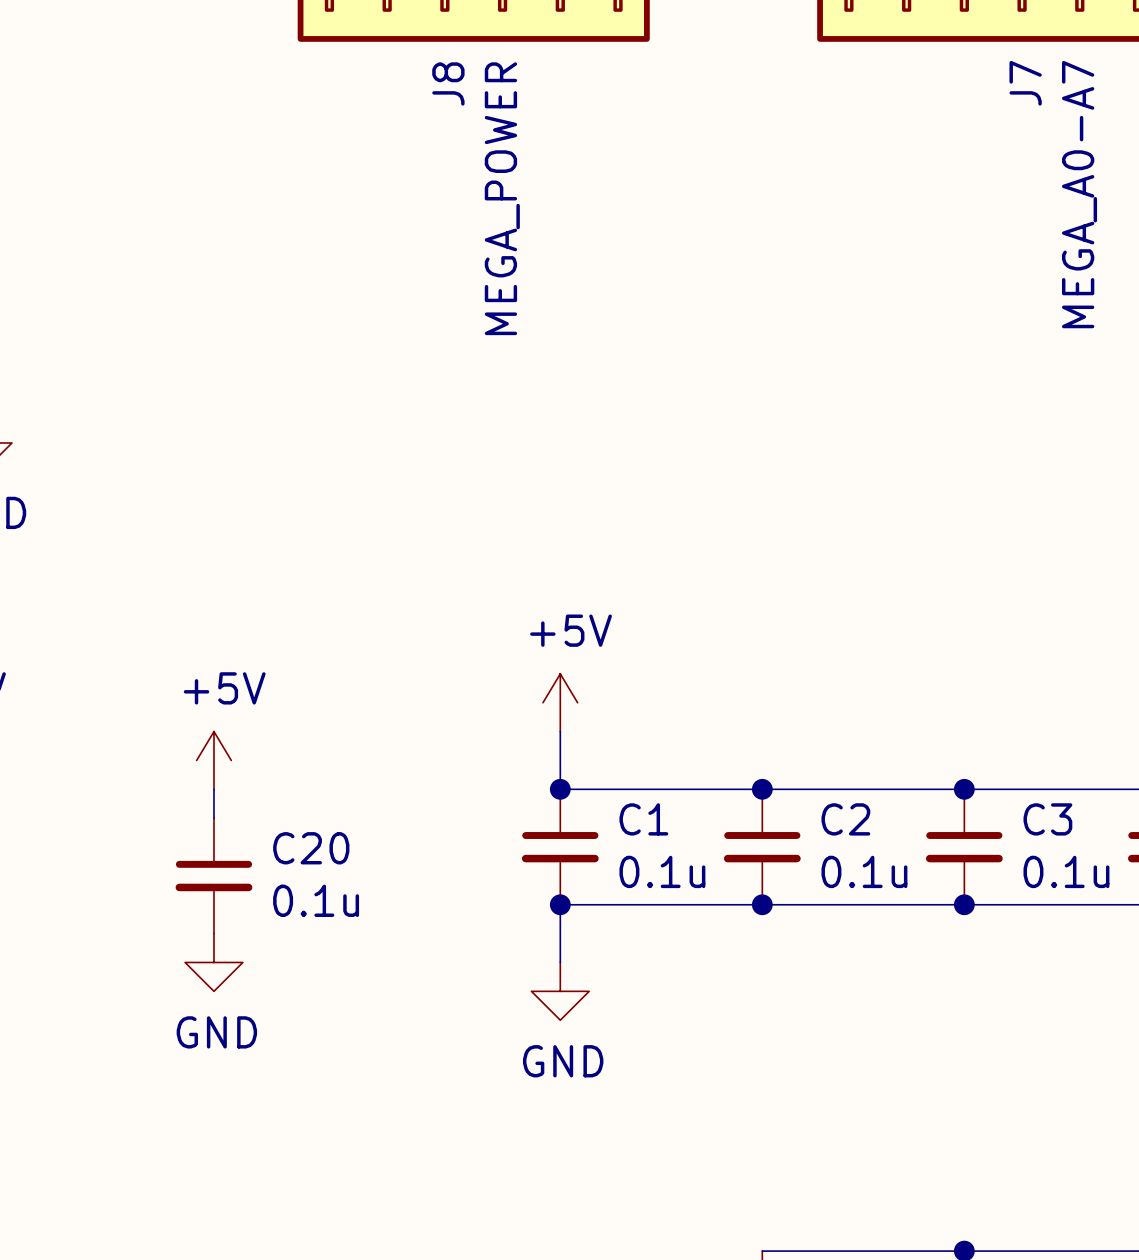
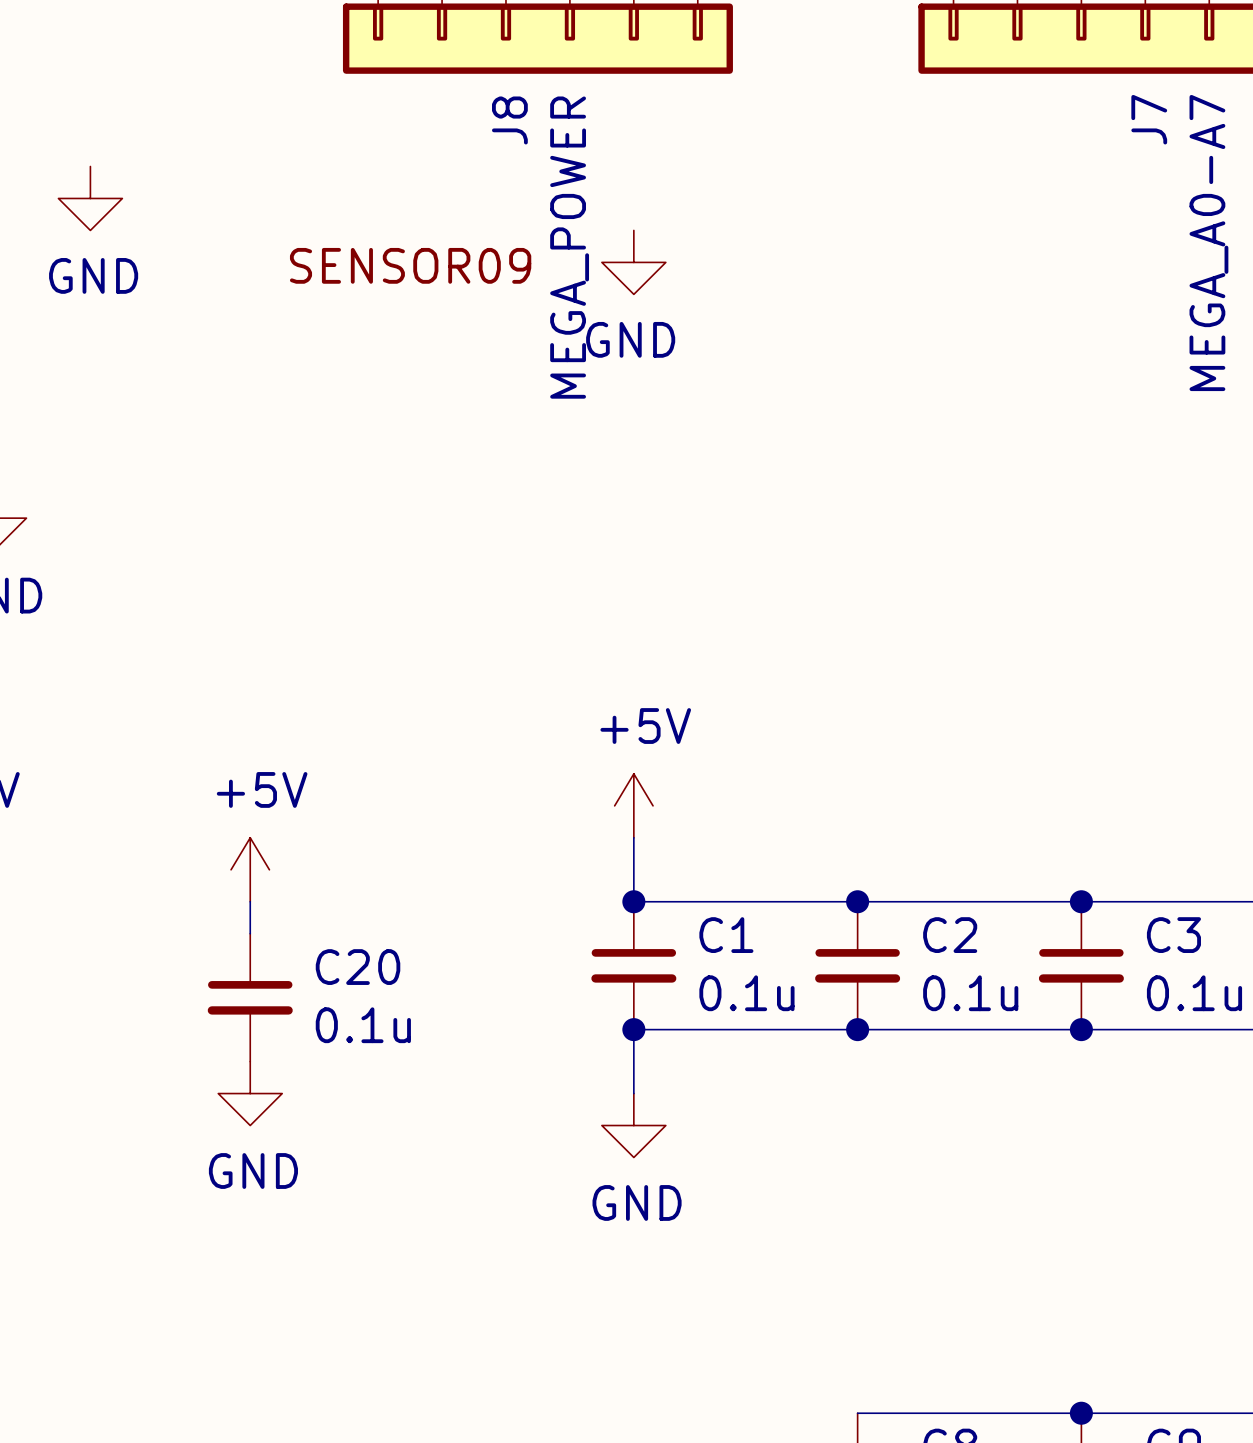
power symbol: none -> GND (90, 198)
power symbol: none -> GND (633, 262)
label: none -> SENSOR09 (410, 265)

